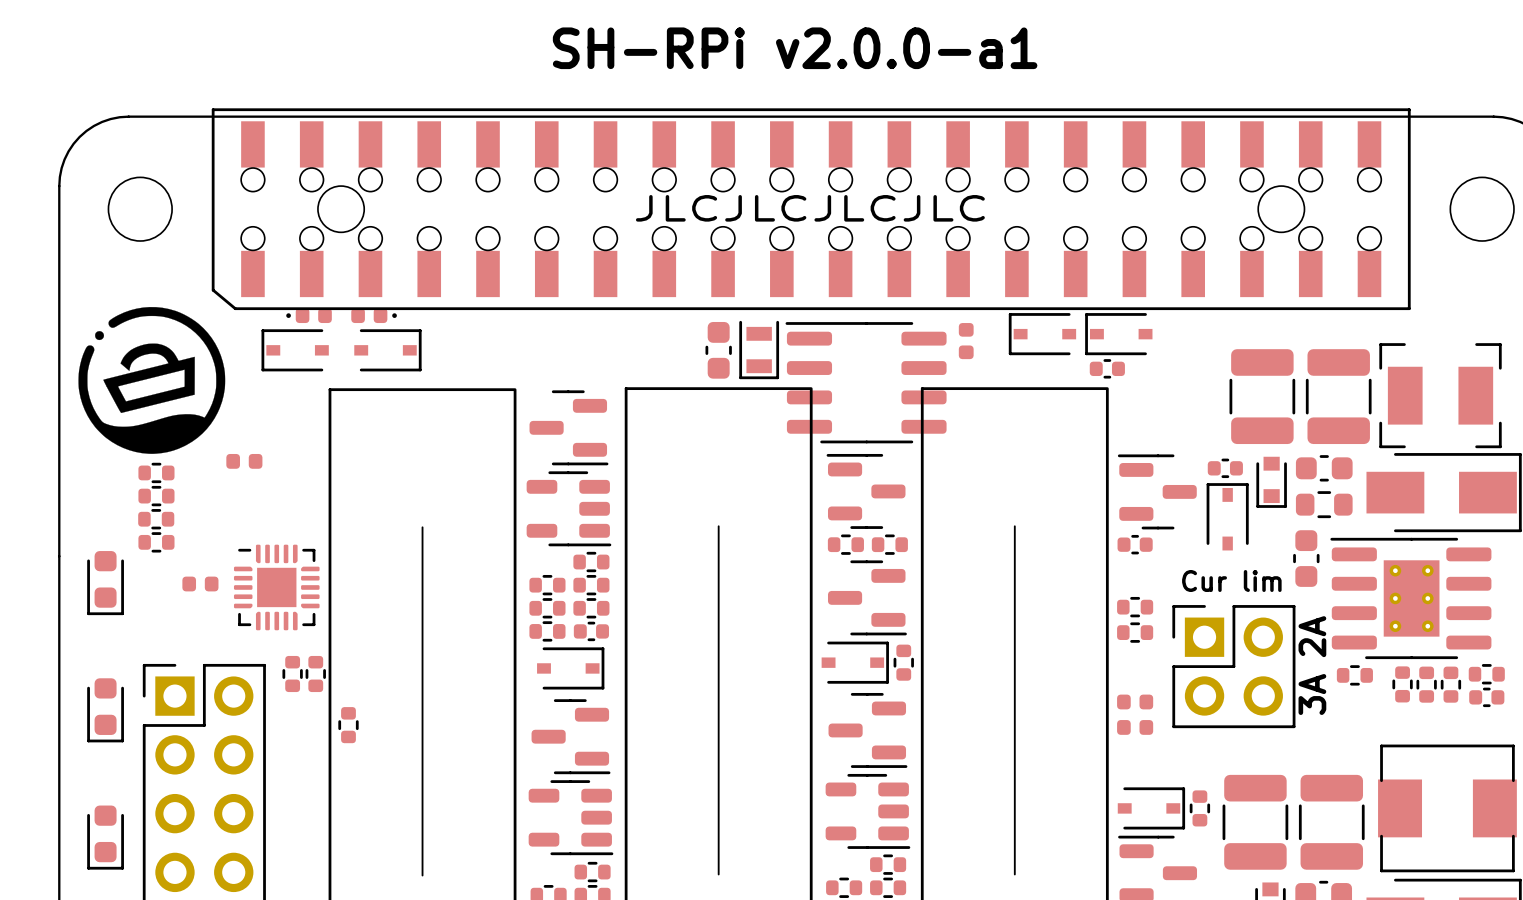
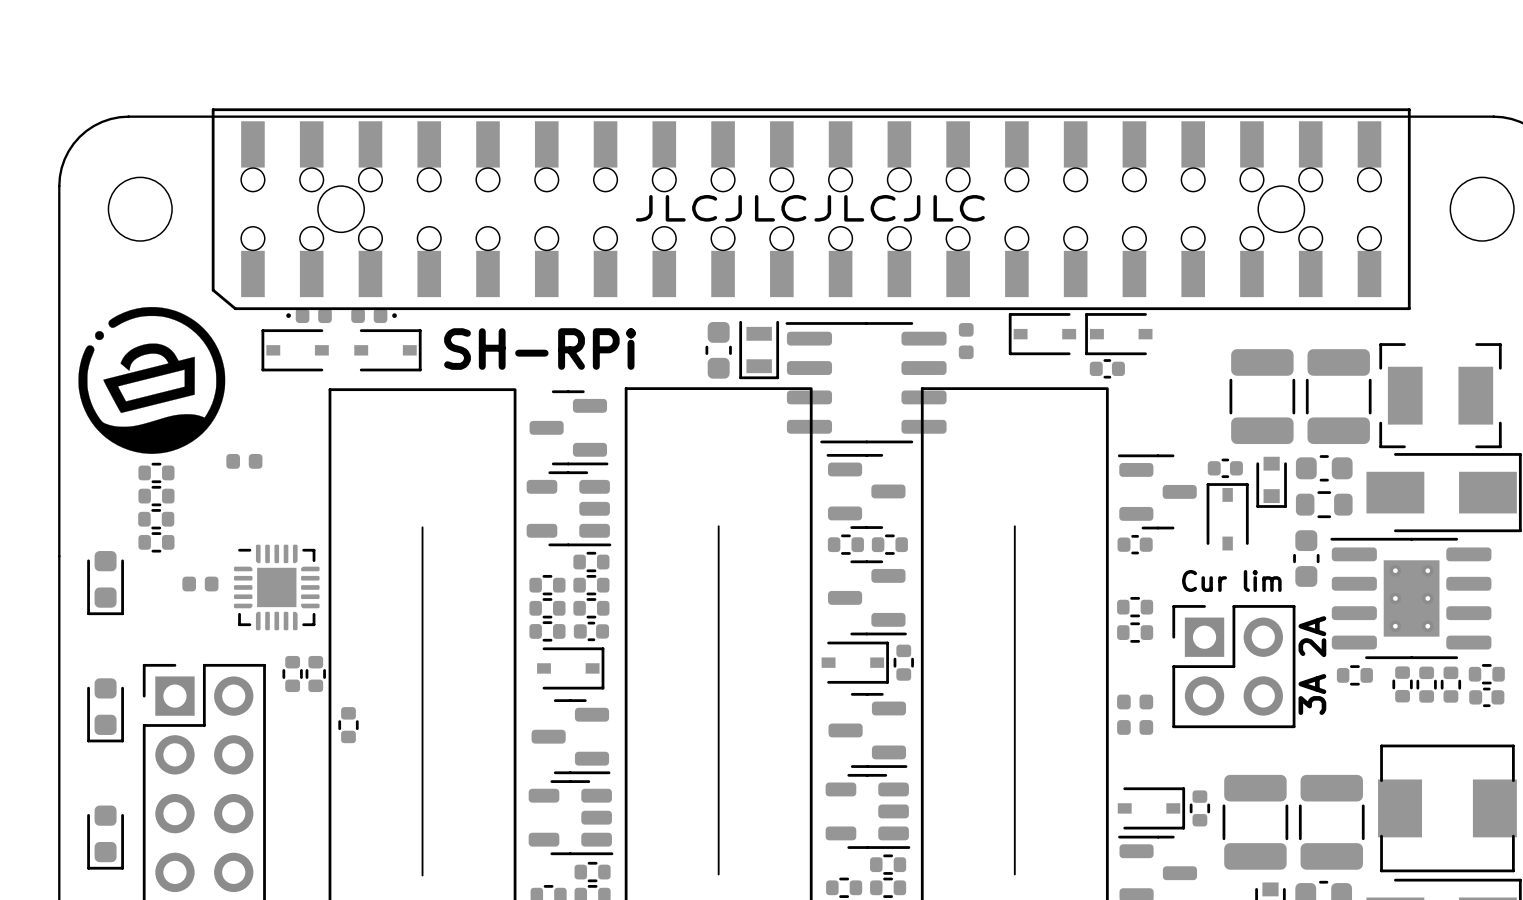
text: SH-RPi v2.0.0-a1 (795, 48) -> none
text: none -> SH-RPi (540, 349)

